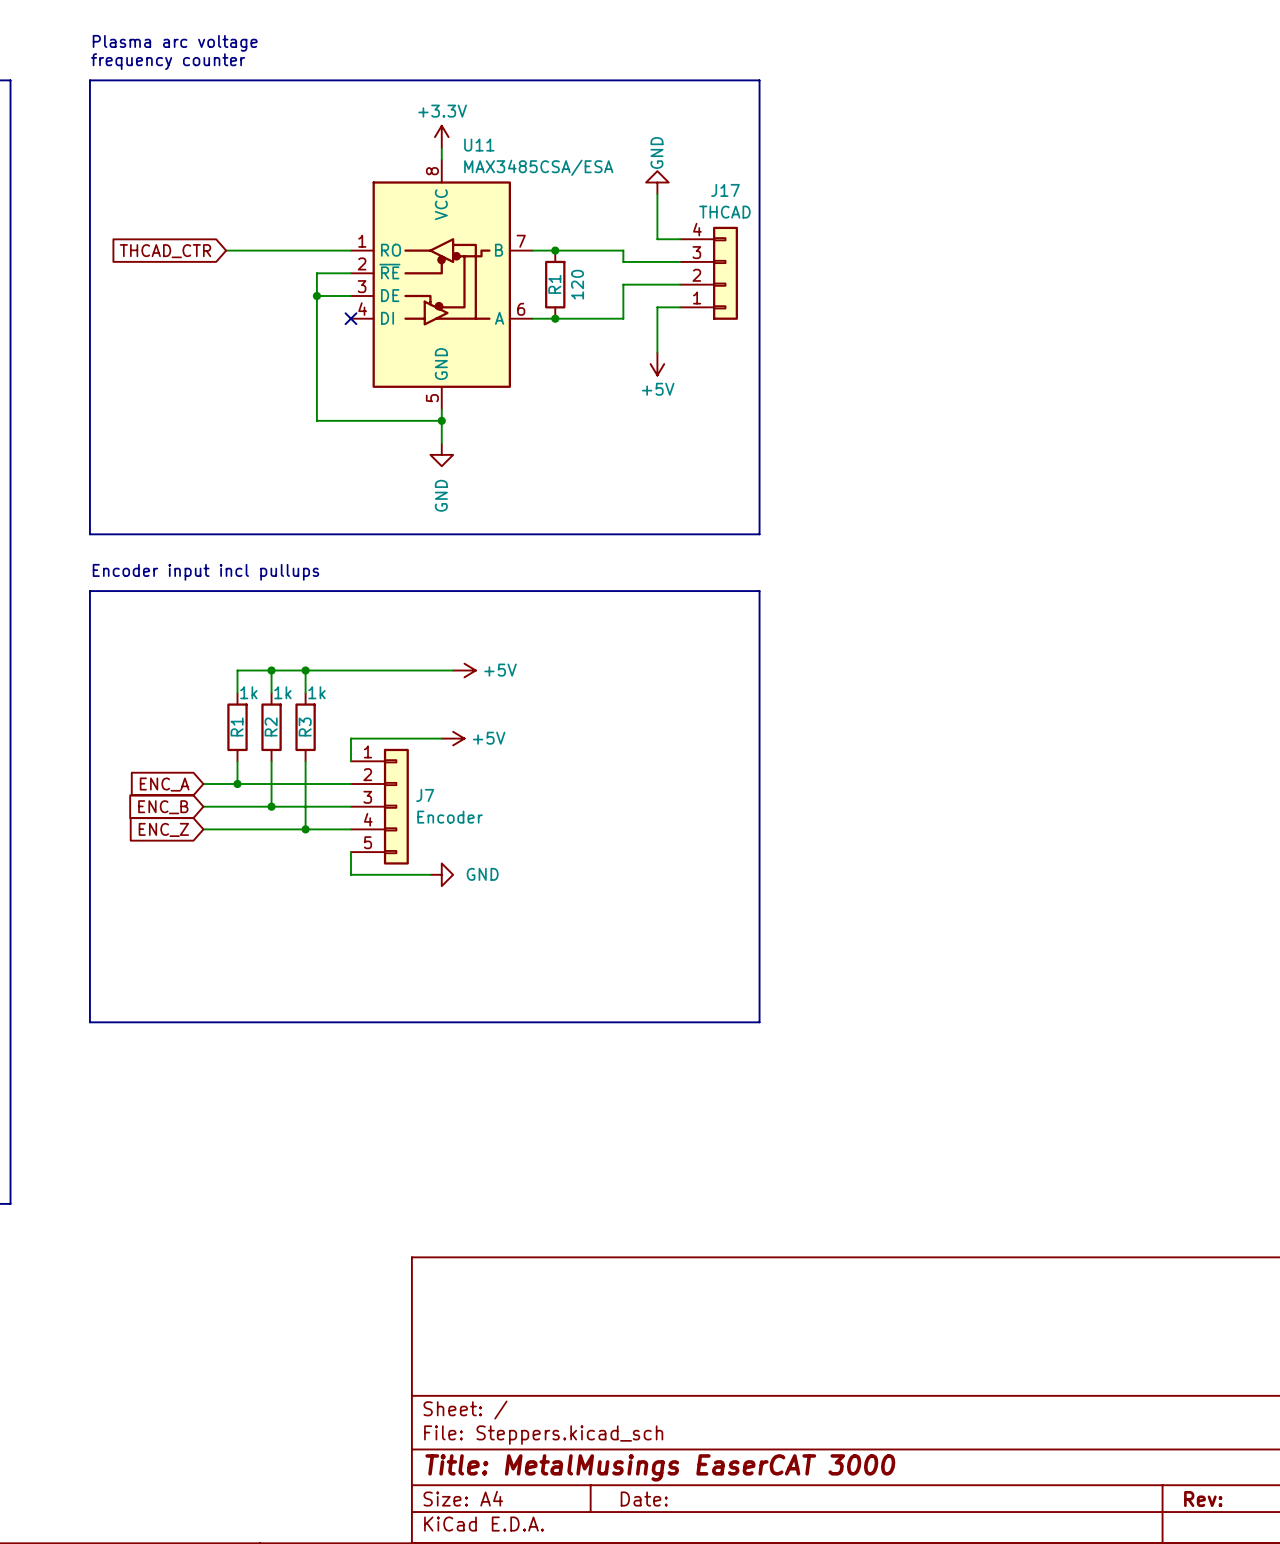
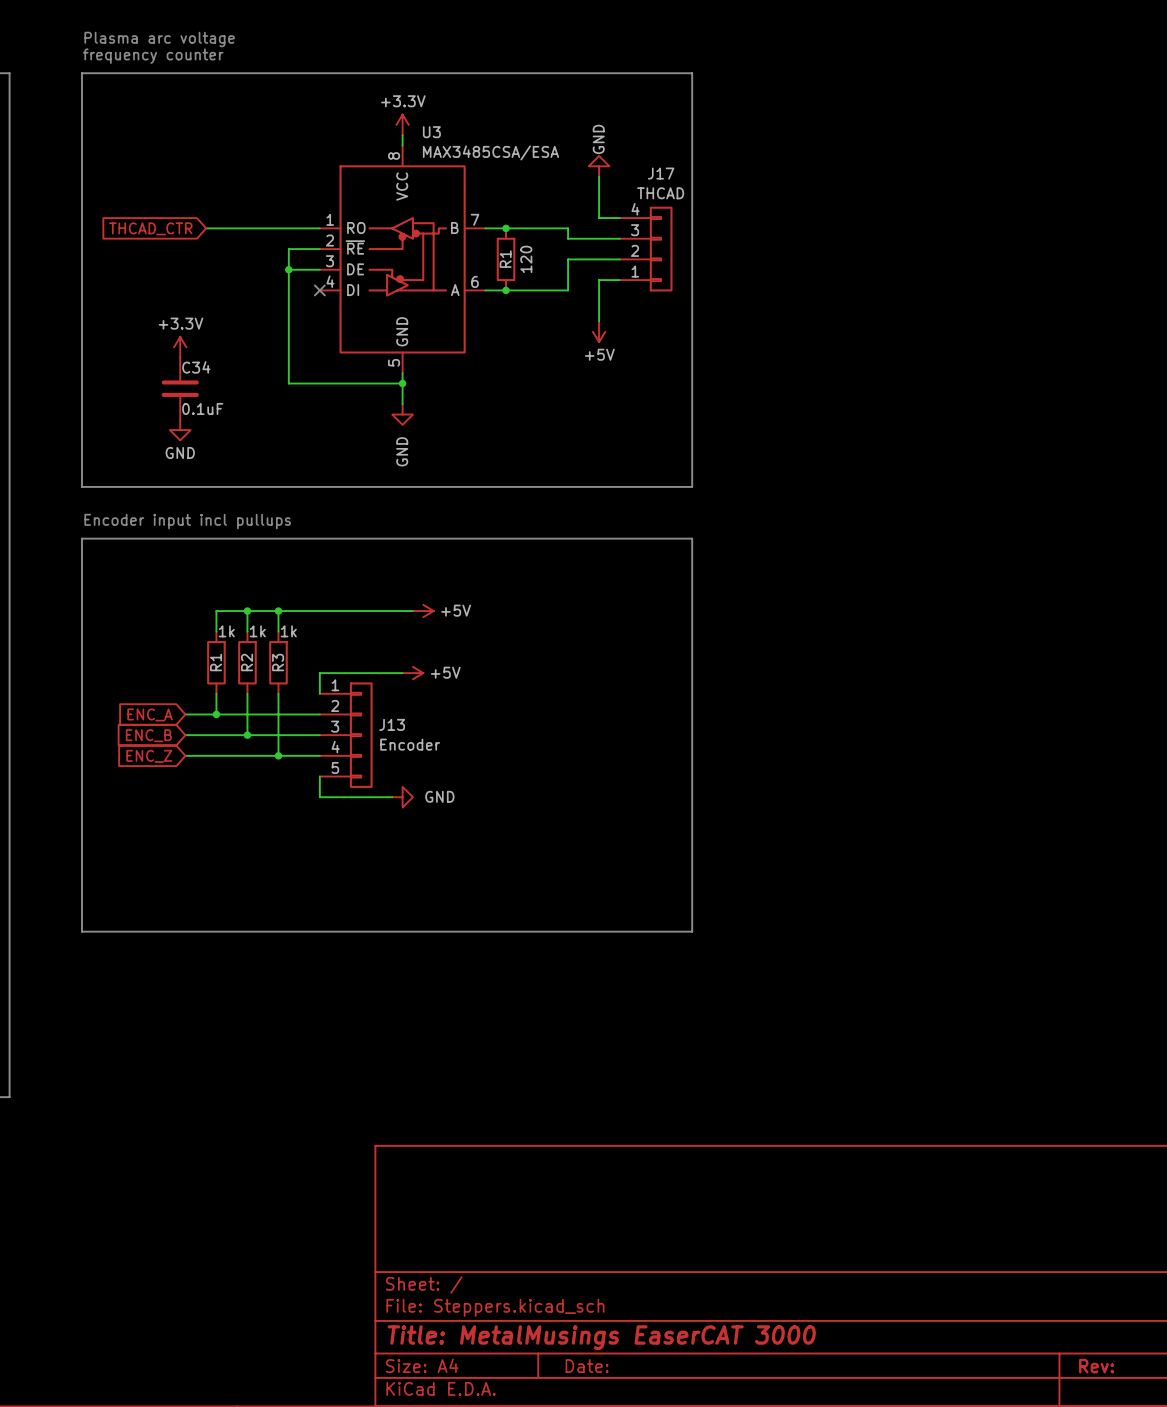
U11 name: U11 (479, 145) -> U3 (431, 132)
power symbol: none -> +3.3V (180, 347)
C34: none -> 0.1uF (180, 388)
power symbol: none -> GND (180, 430)
J7 name: J7 (425, 795) -> J13 (392, 724)

